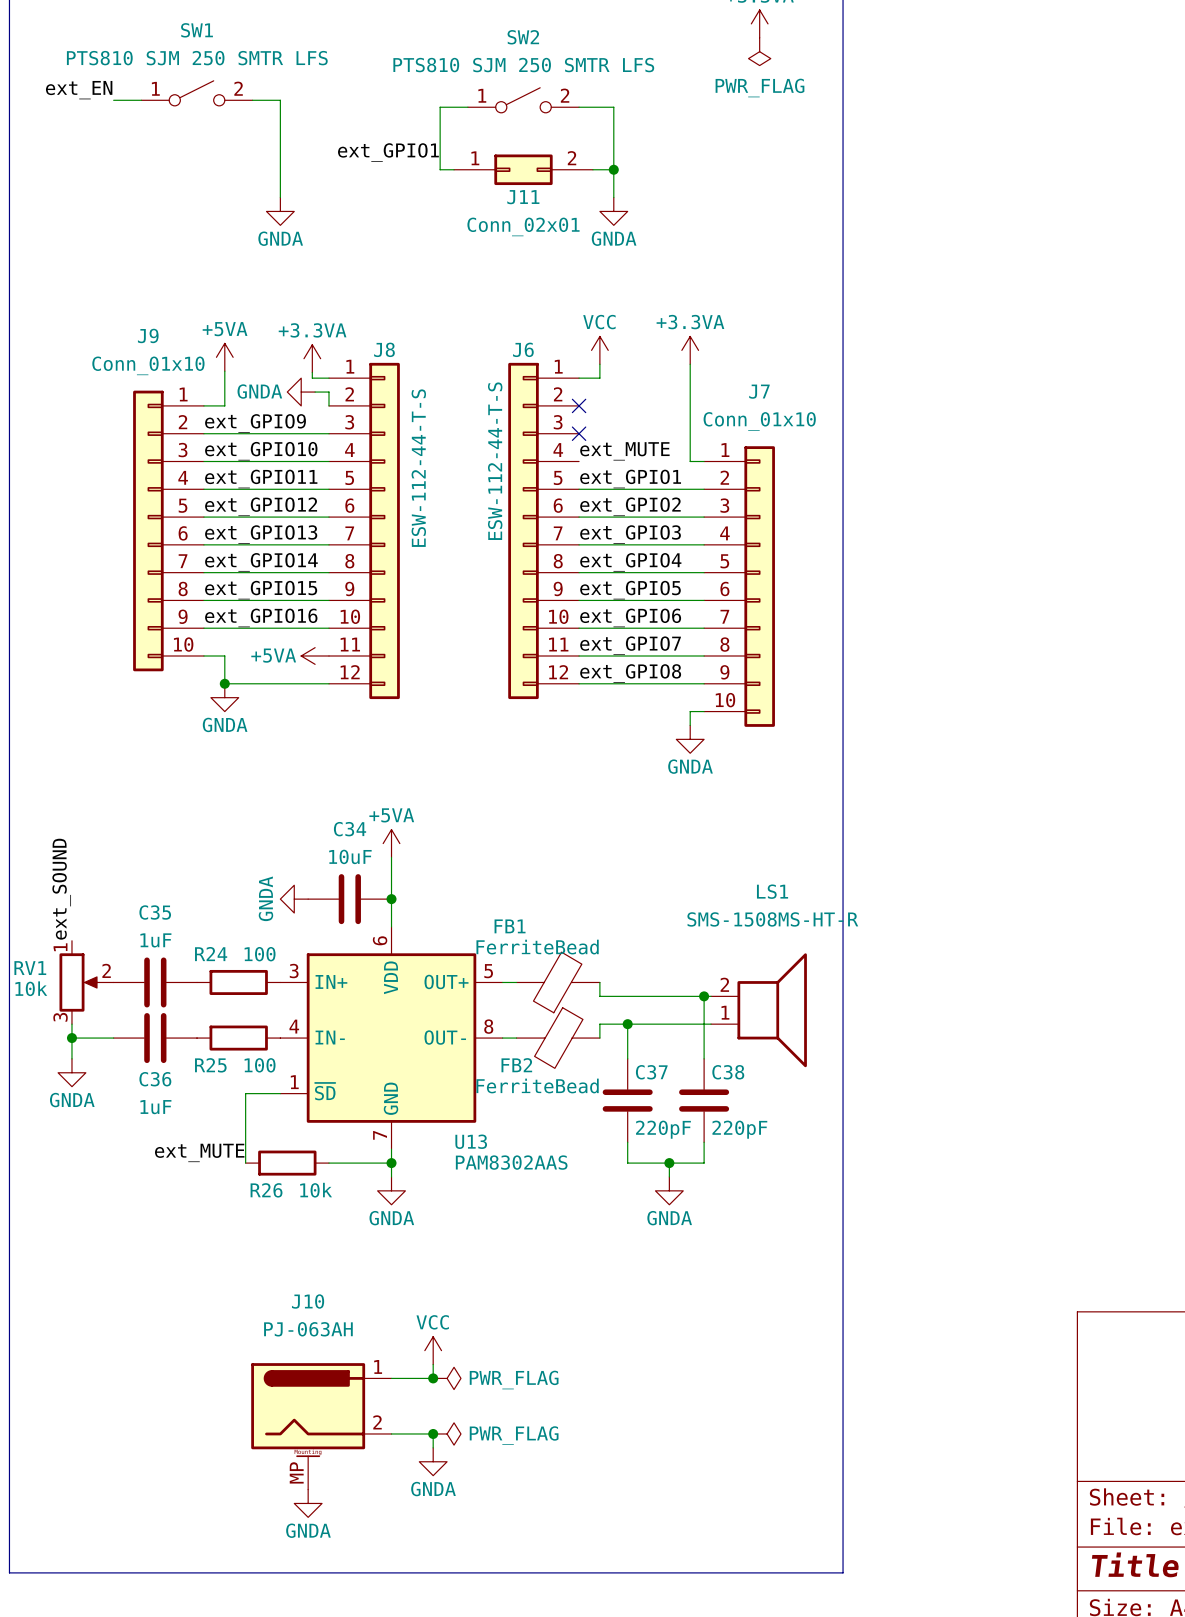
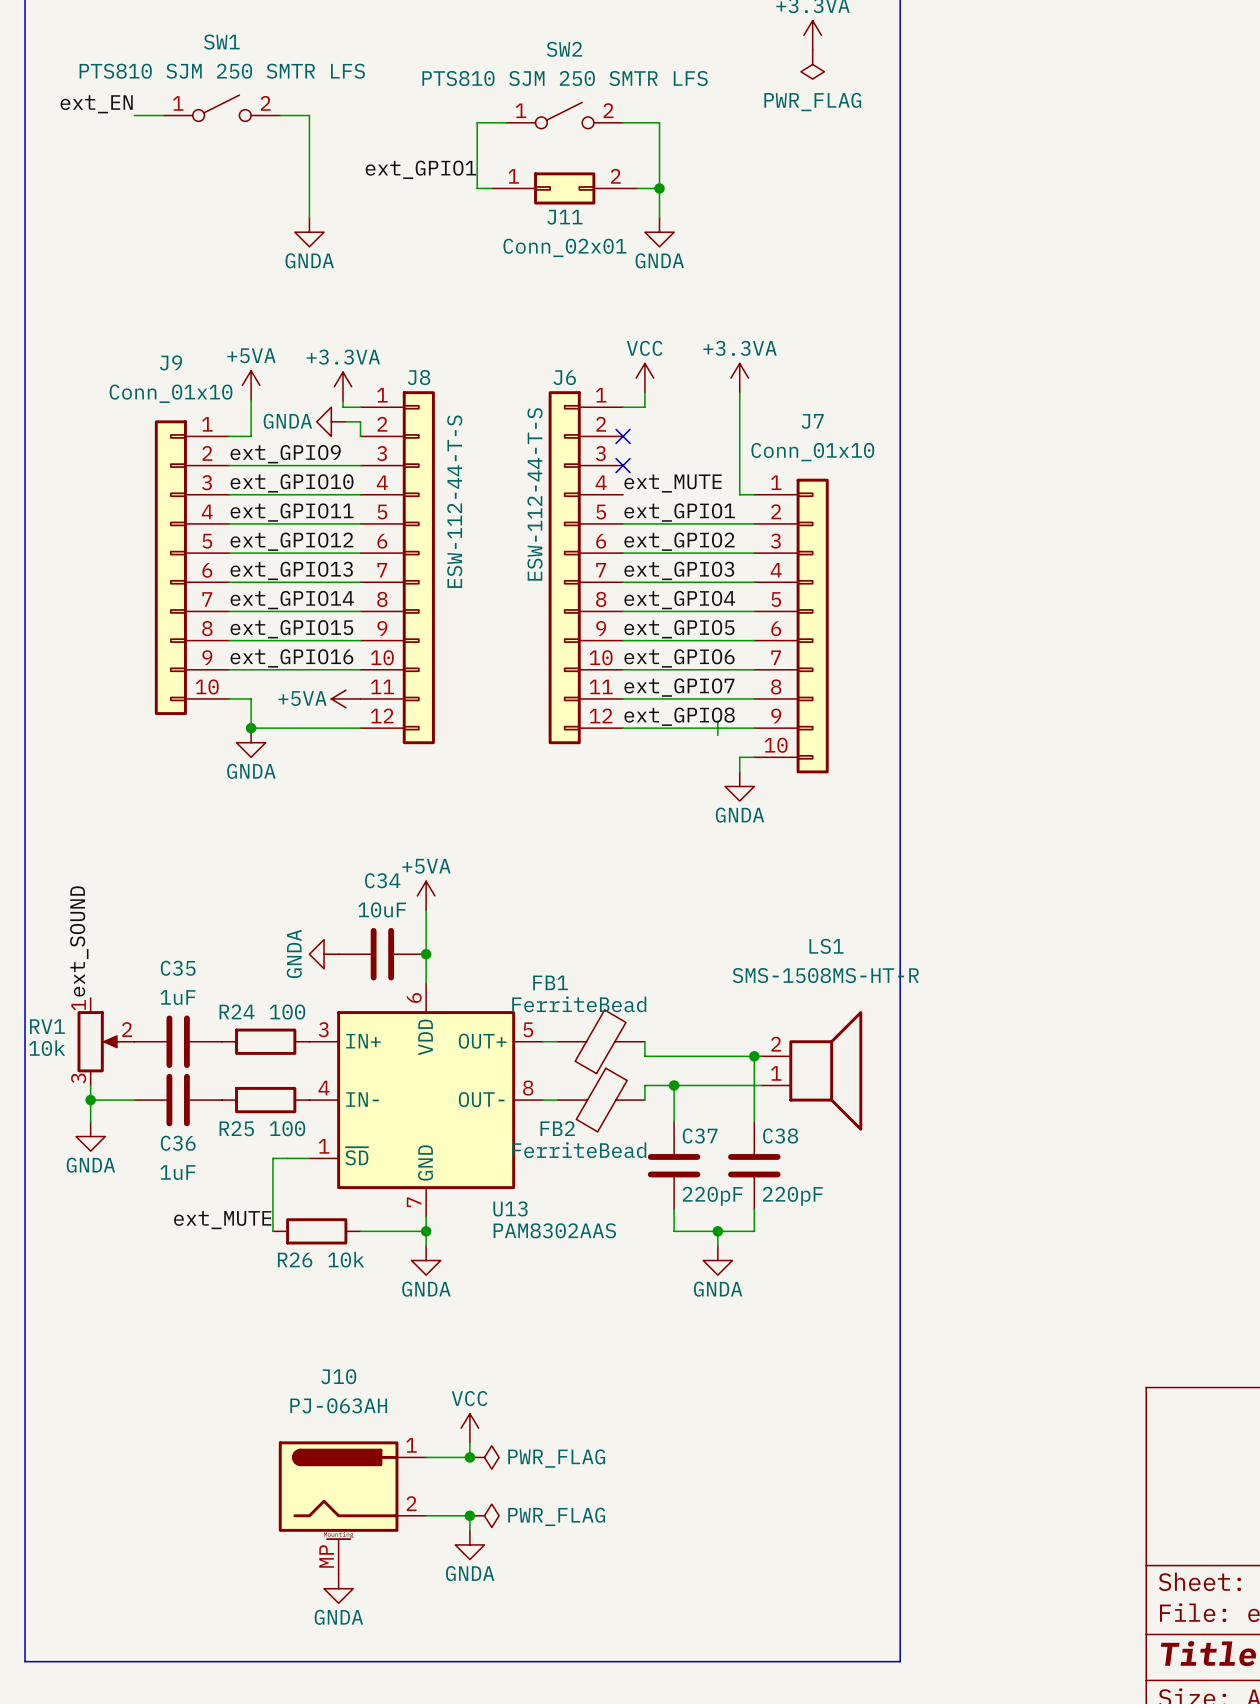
wire: none -> (717, 720) (717, 735)

